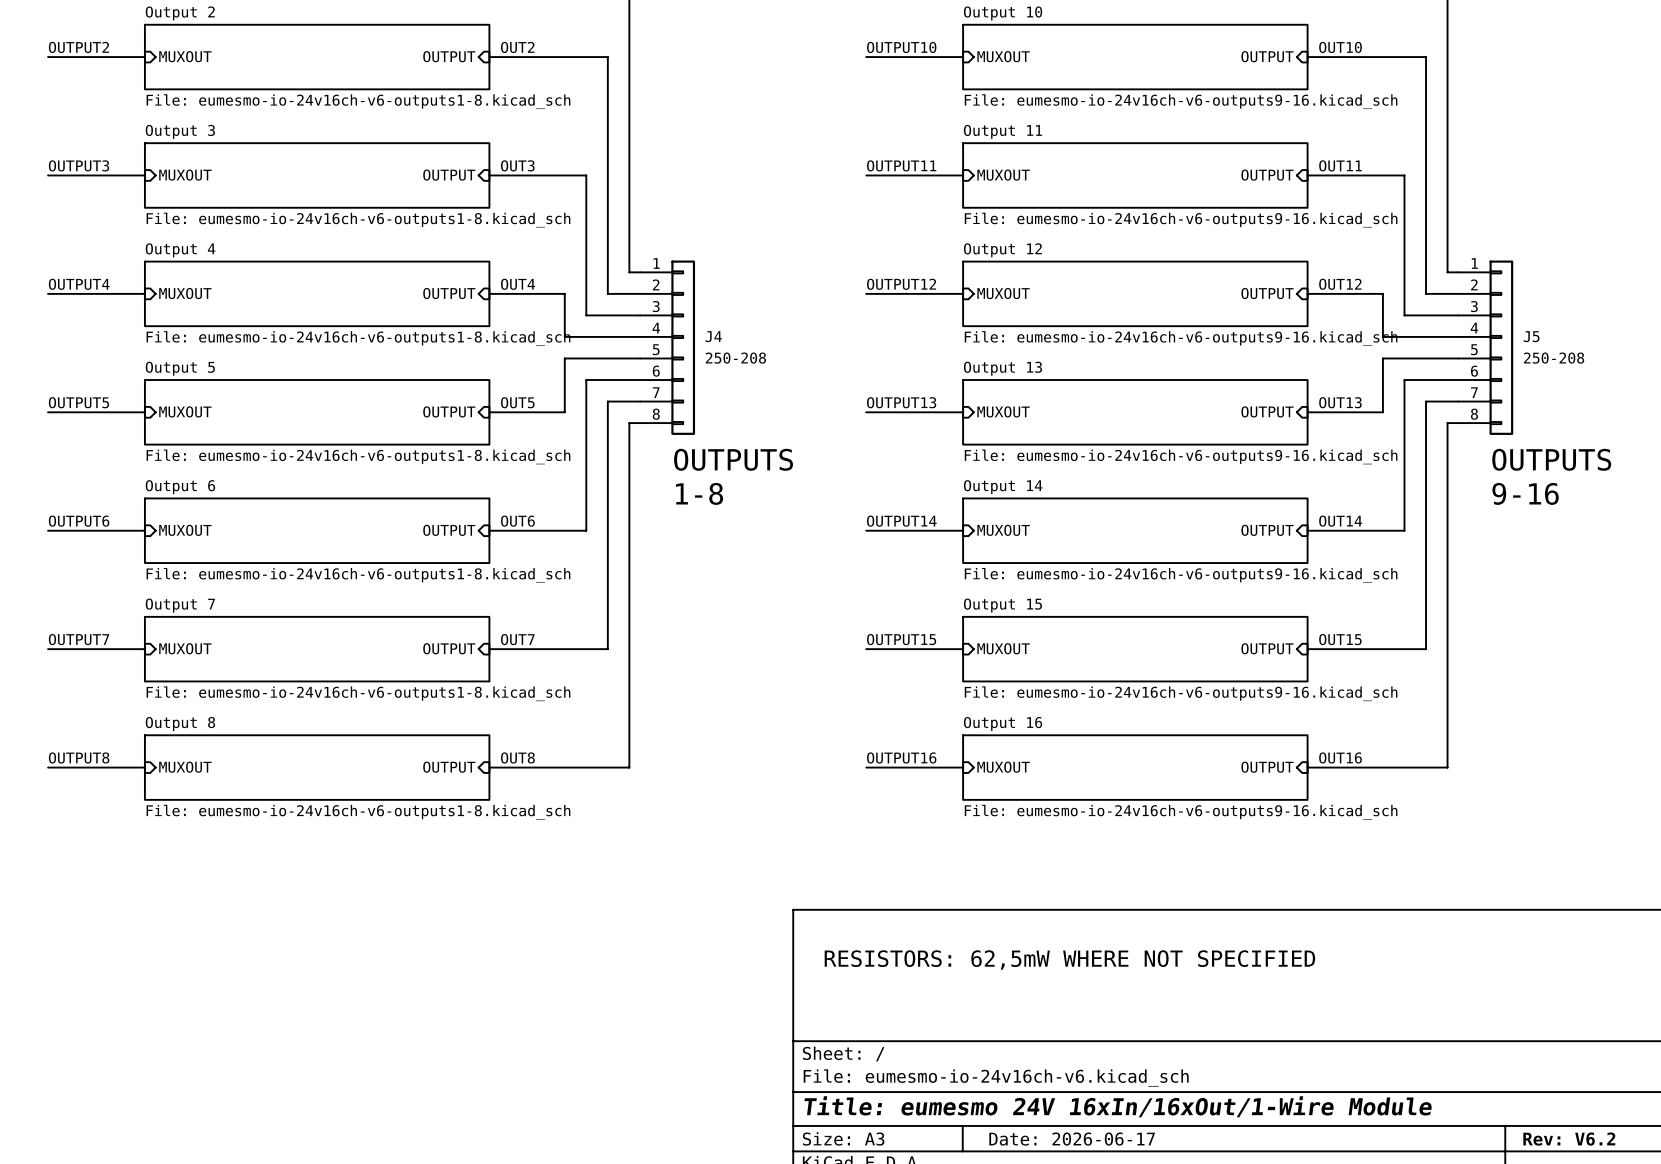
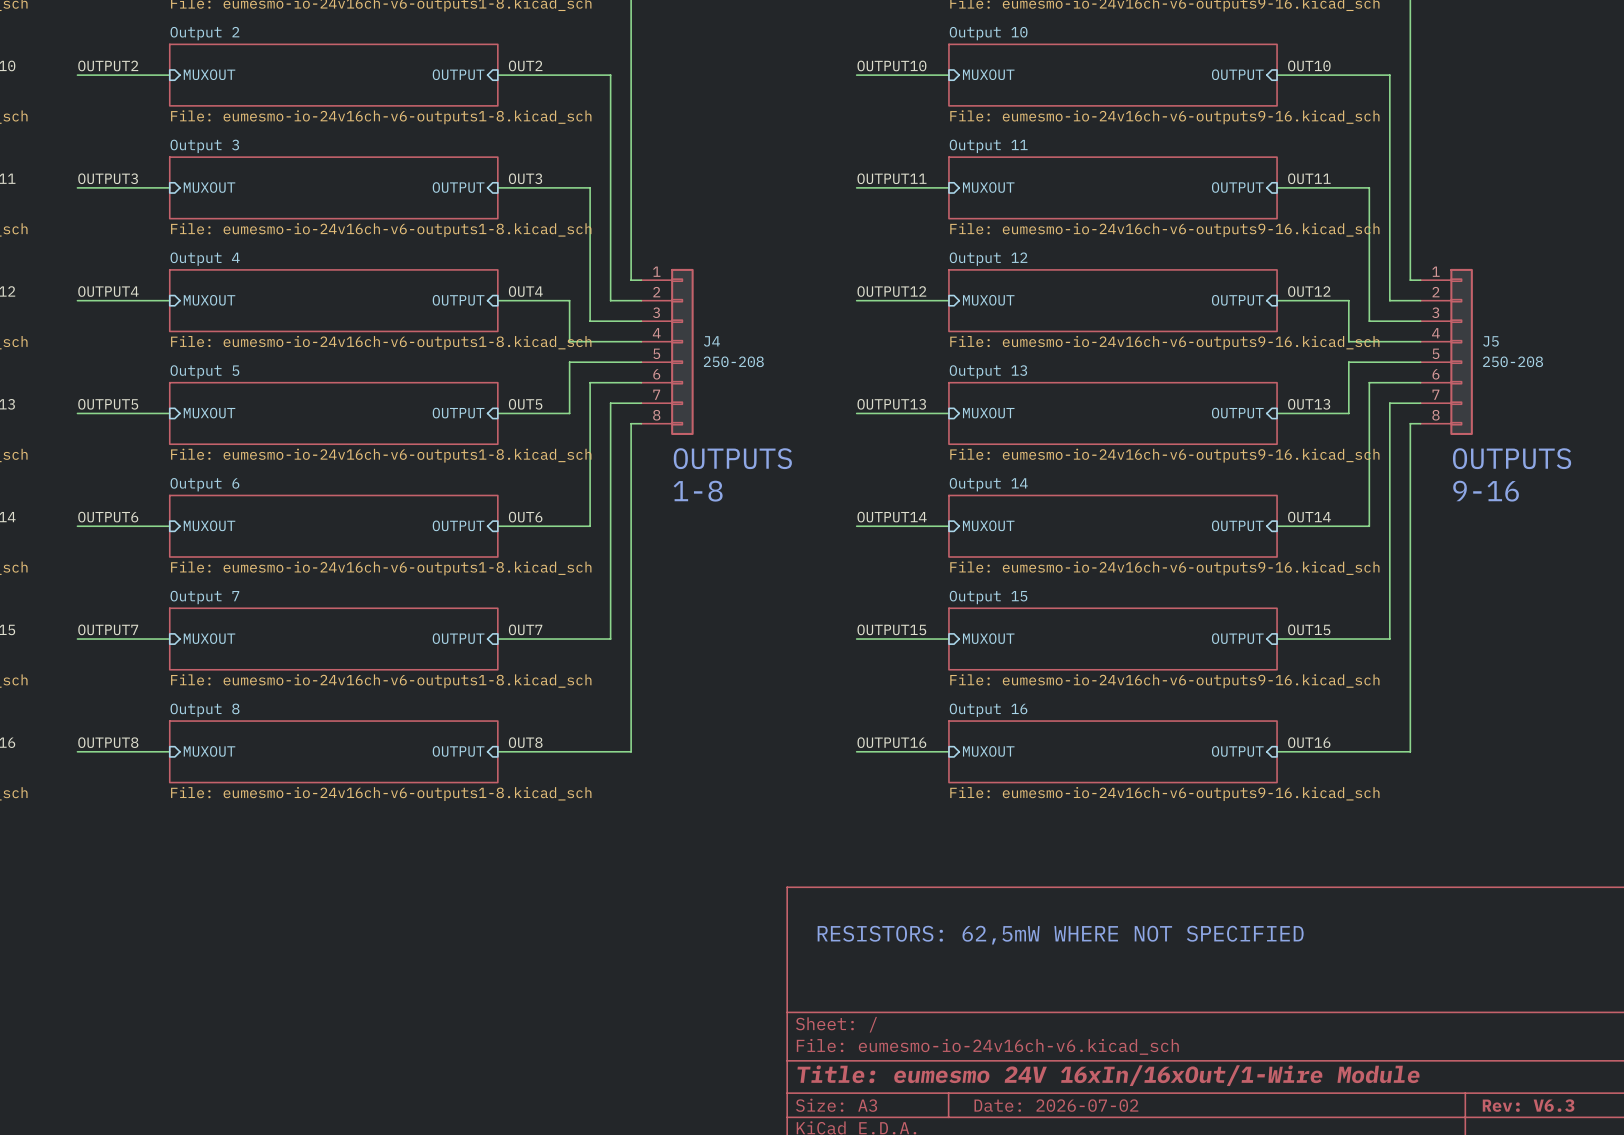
title block: Date: 2026-06-17 (1072, 1139) -> Date: 2026-07-02 (1056, 1105)
title block: Rev: V6.2 (1569, 1139) -> Rev: V6.3 (1528, 1105)

